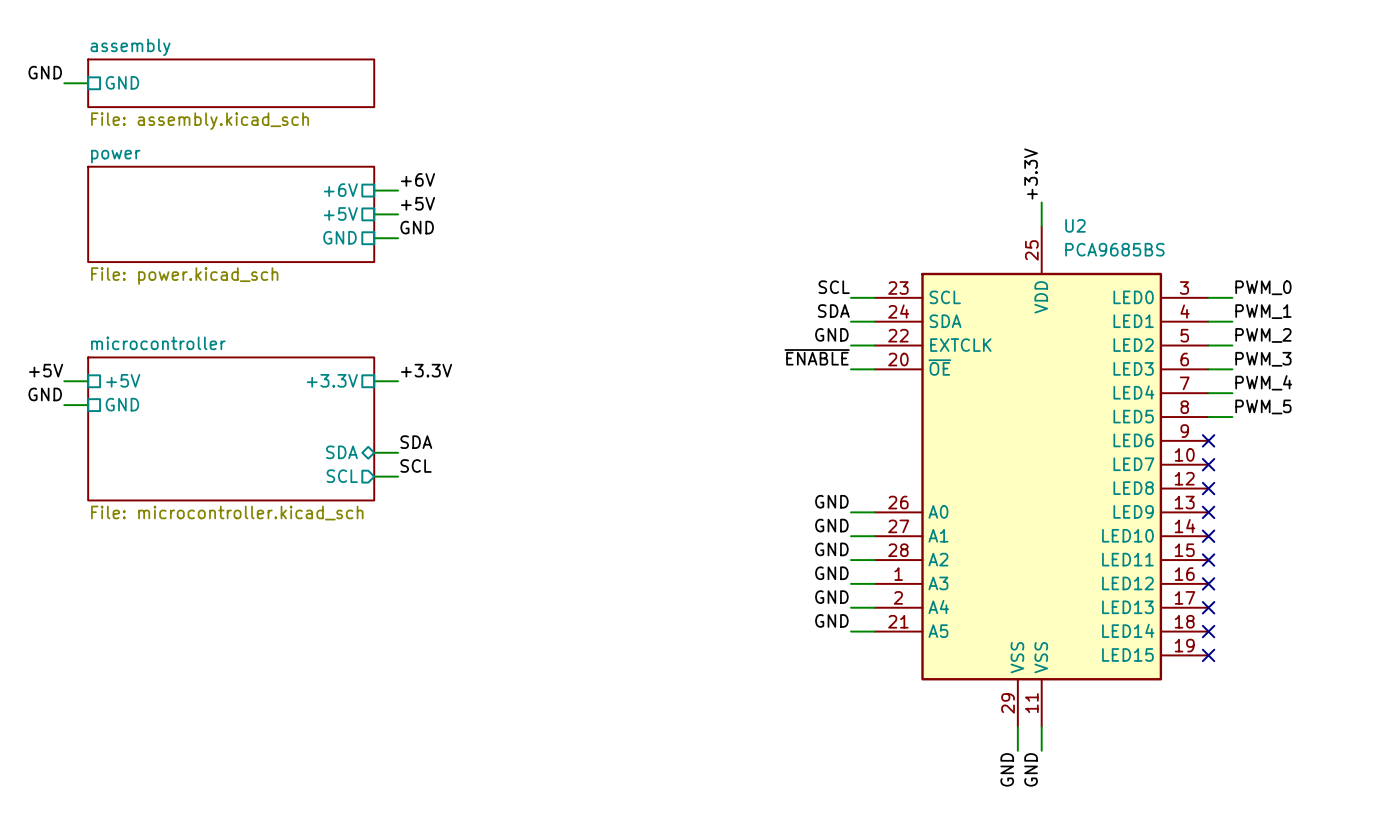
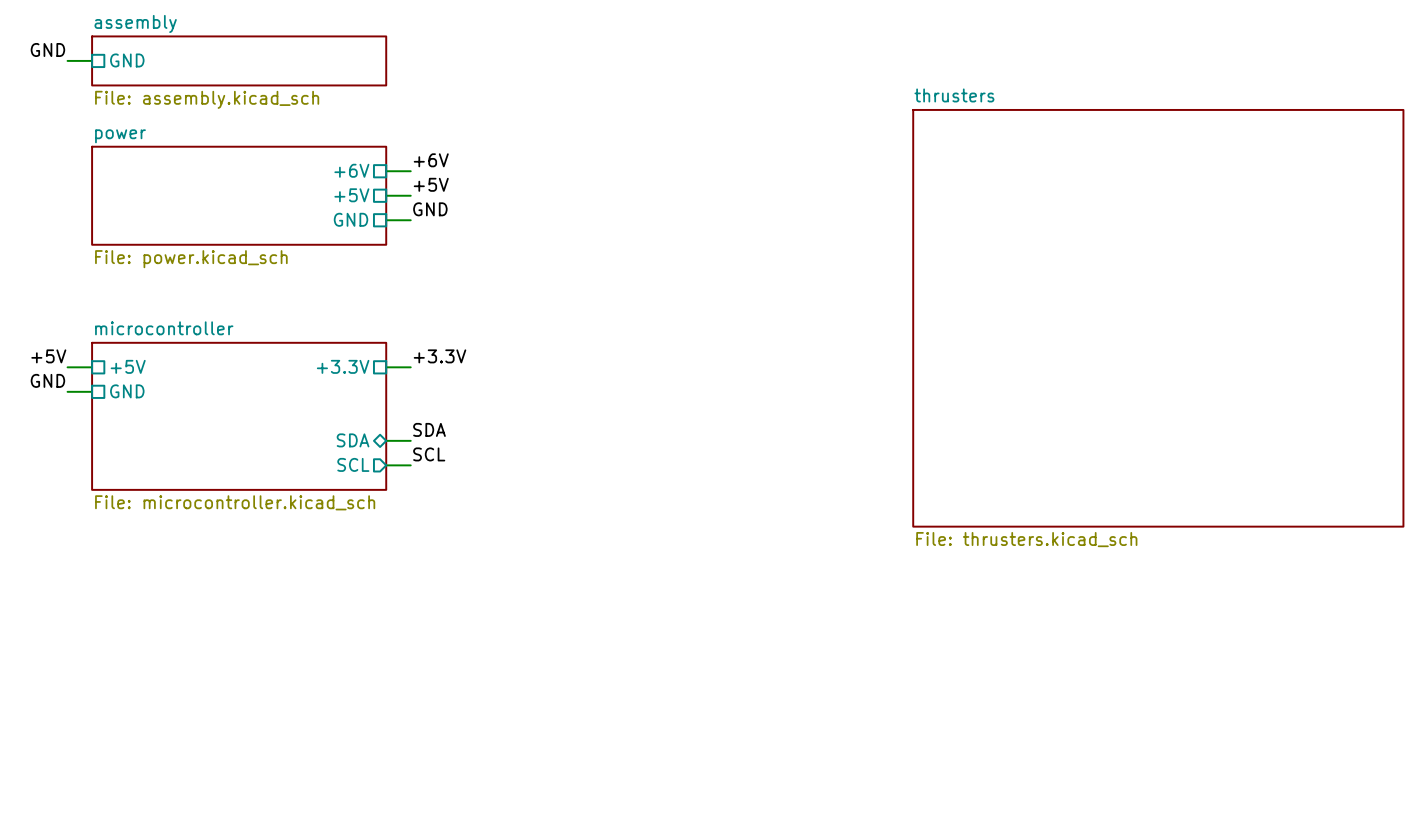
label: +3.3V (1031, 174) -> none
wire: (1041, 202) (1041, 226) -> none
label: SCL (834, 287) -> none
label: PWM_0 (1263, 287) -> none
wire: (850, 297) (874, 297) -> none
wire: (1208, 297) (1232, 297) -> none
label: SDA (833, 311) -> none
label: PWM_1 (1263, 311) -> none
wire: (850, 321) (874, 321) -> none
wire: (1208, 321) (1232, 321) -> none
sheet thrusters: none -> File: thrusters.kicad_sch (1158, 318)
label: GND (831, 334) -> none
label: PWM_2 (1263, 335) -> none
wire: (850, 345) (874, 345) -> none
wire: (1208, 345) (1232, 345) -> none
label: ~{ENABLE} (817, 357) -> none
label: PWM_3 (1263, 359) -> none
wire: (850, 369) (874, 369) -> none
wire: (1208, 369) (1232, 369) -> none
label: PWM_4 (1263, 382) -> none
wire: (1208, 393) (1232, 393) -> none
label: PWM_5 (1263, 406) -> none
wire: (1208, 417) (1232, 417) -> none
no-connect mark: (1208, 440) -> none
no-connect mark: (1208, 464) -> none
U2: PCA9685BS (1041, 476) -> none
no-connect mark: (1208, 488) -> none
label: GND (831, 501) -> none
wire: (850, 512) (874, 512) -> none
no-connect mark: (1208, 512) -> none
label: GND (831, 525) -> none
wire: (850, 536) (874, 536) -> none
no-connect mark: (1208, 536) -> none
label: GND (831, 549) -> none
wire: (850, 560) (874, 560) -> none
no-connect mark: (1208, 560) -> none
label: GND (831, 573) -> none
wire: (850, 583) (874, 583) -> none
no-connect mark: (1208, 583) -> none
label: GND (831, 597) -> none
wire: (850, 607) (874, 607) -> none
no-connect mark: (1208, 607) -> none
label: GND (831, 620) -> none
wire: (850, 631) (874, 631) -> none
no-connect mark: (1208, 631) -> none
no-connect mark: (1208, 655) -> none
wire: (1017, 726) (1017, 750) -> none
wire: (1041, 726) (1041, 750) -> none
label: GND (1007, 769) -> none
label: GND (1031, 769) -> none

